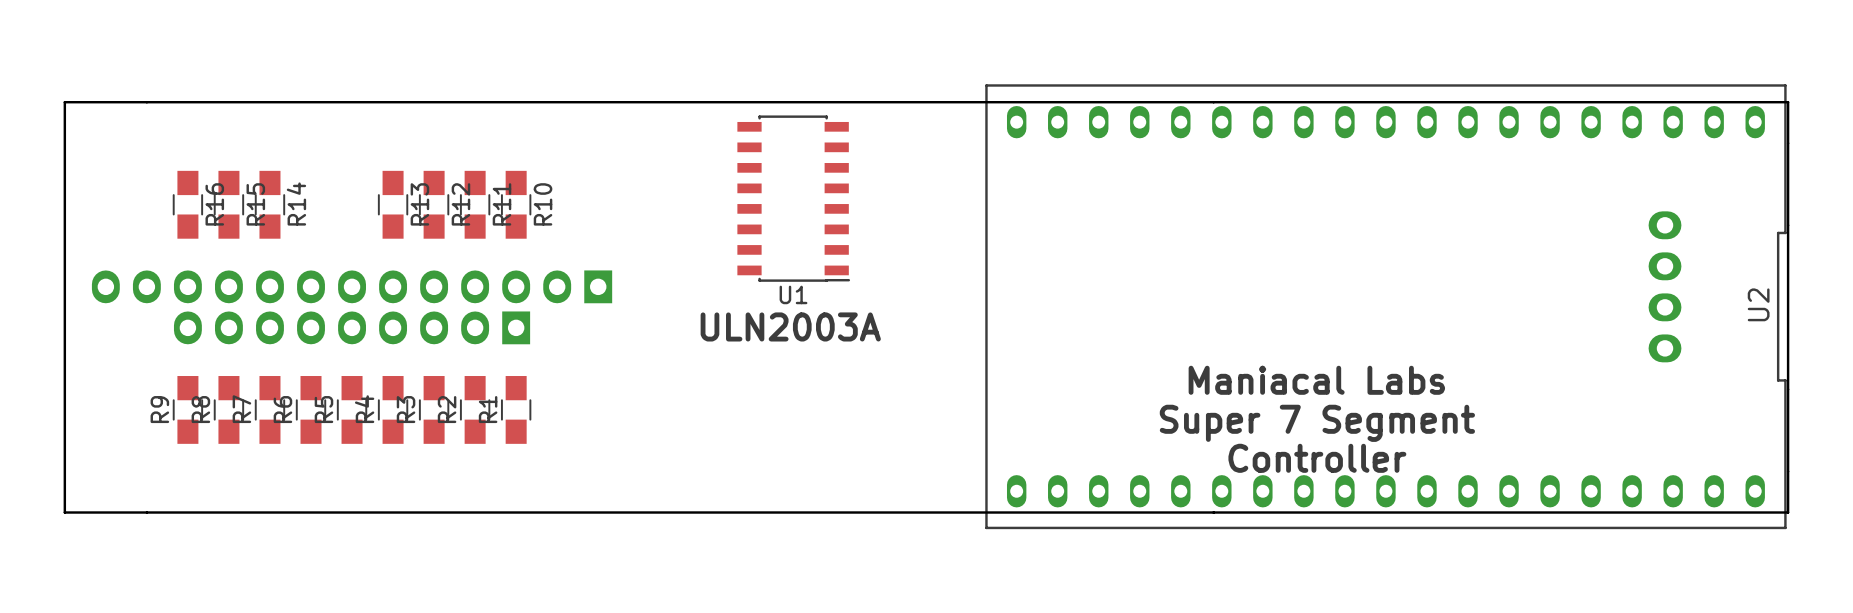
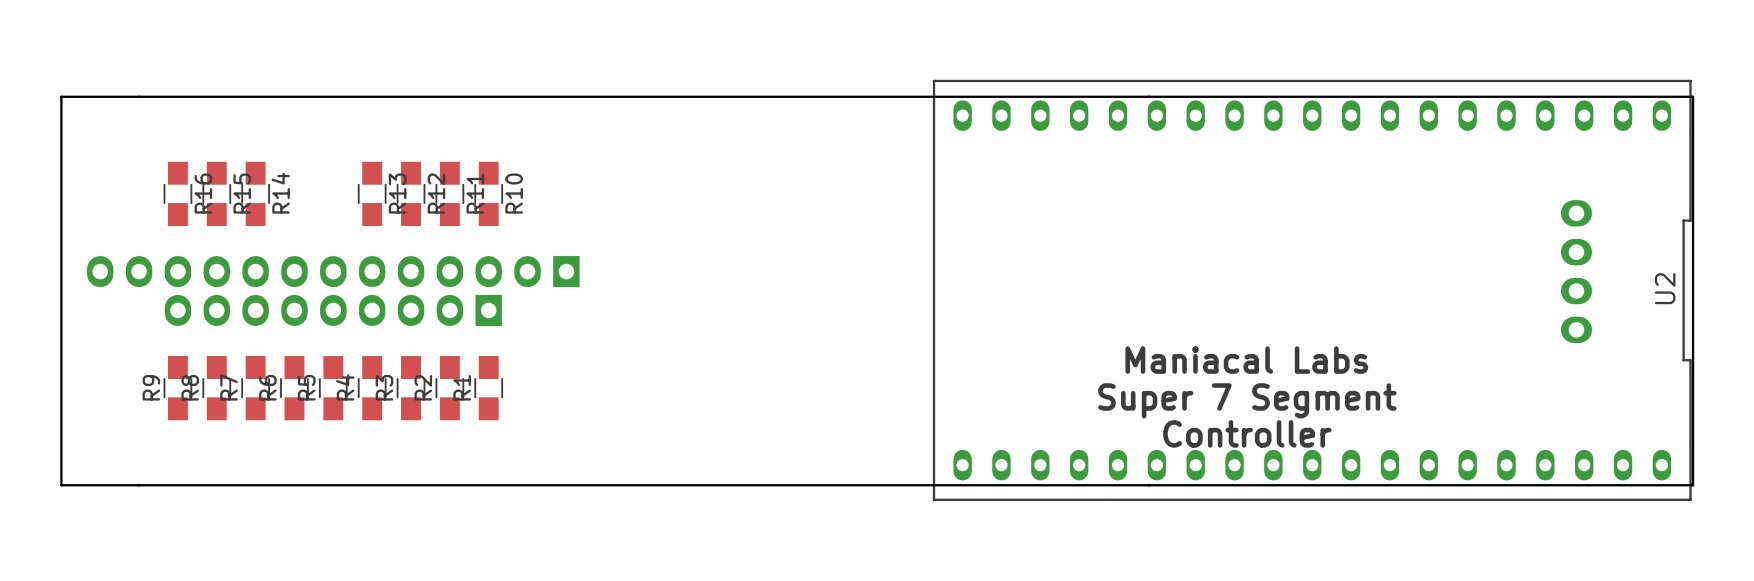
U1: (793, 198) -> none
text: ULN2003A (790, 326) -> none

